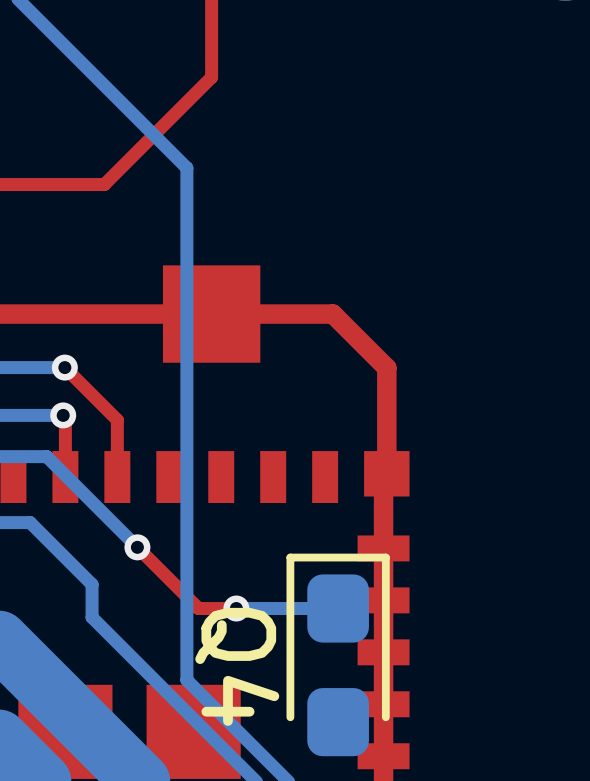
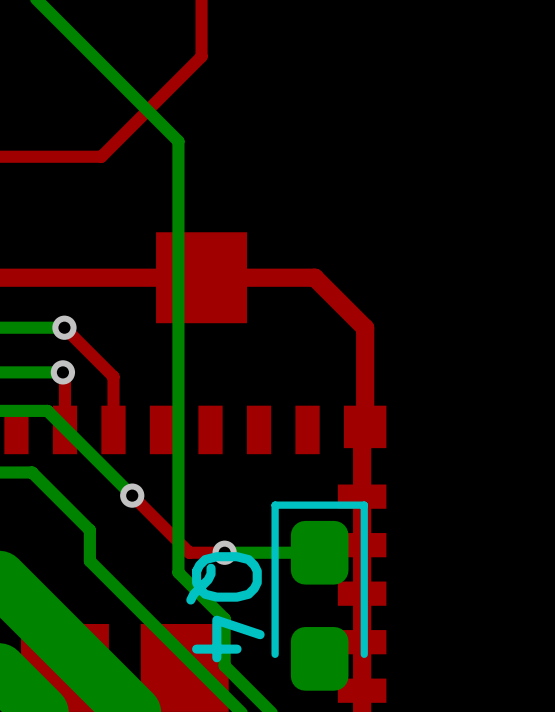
bottom track: (186, 629) (186, 680) (236, 729) -> (178, 572) (224, 618) (224, 665)

